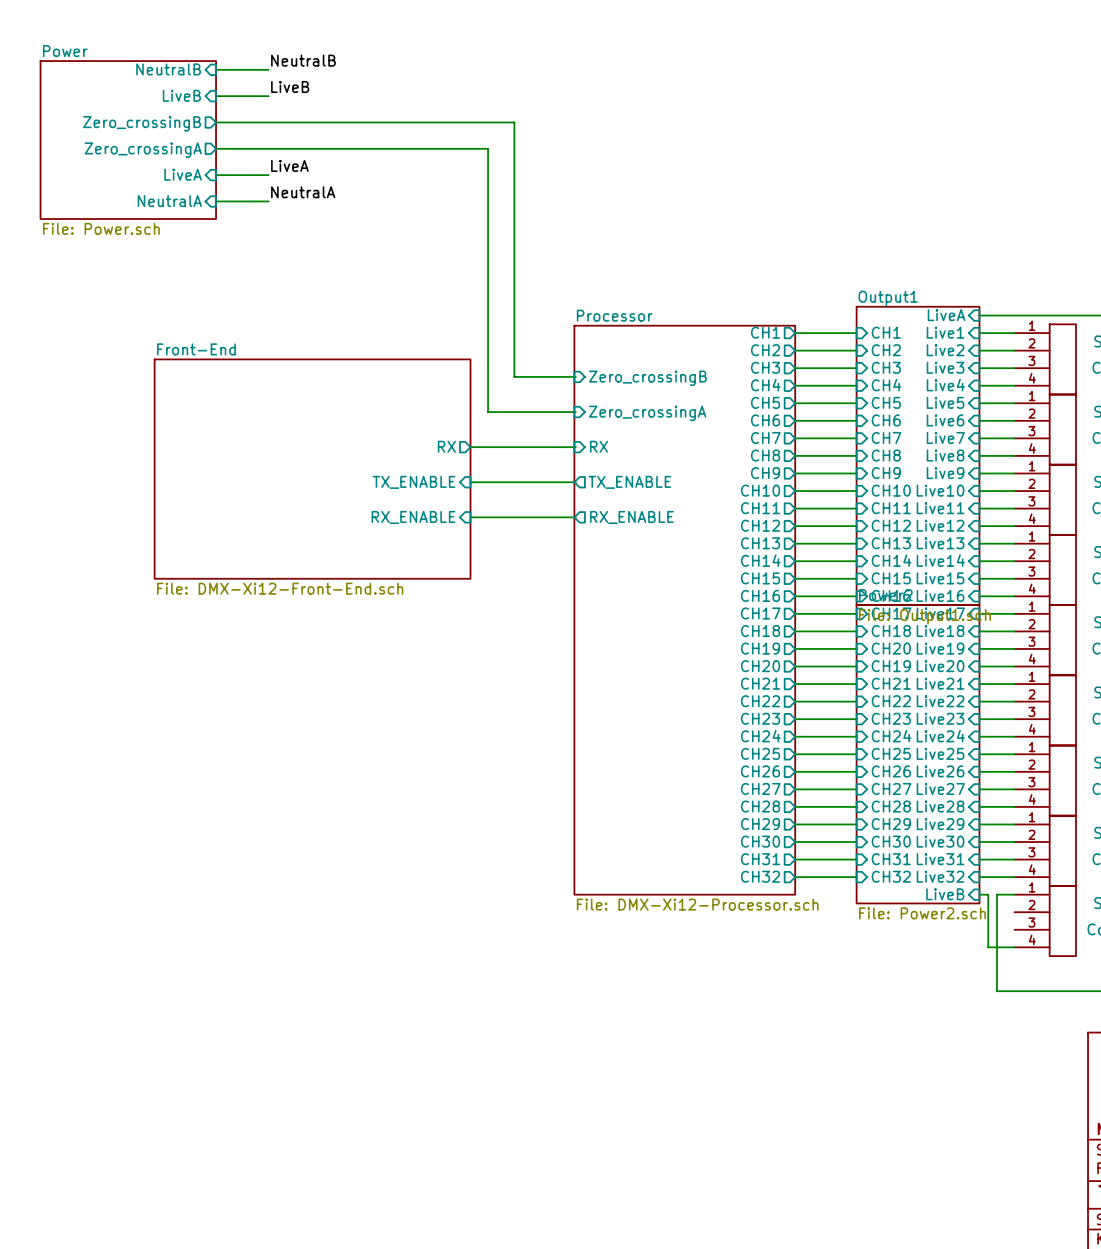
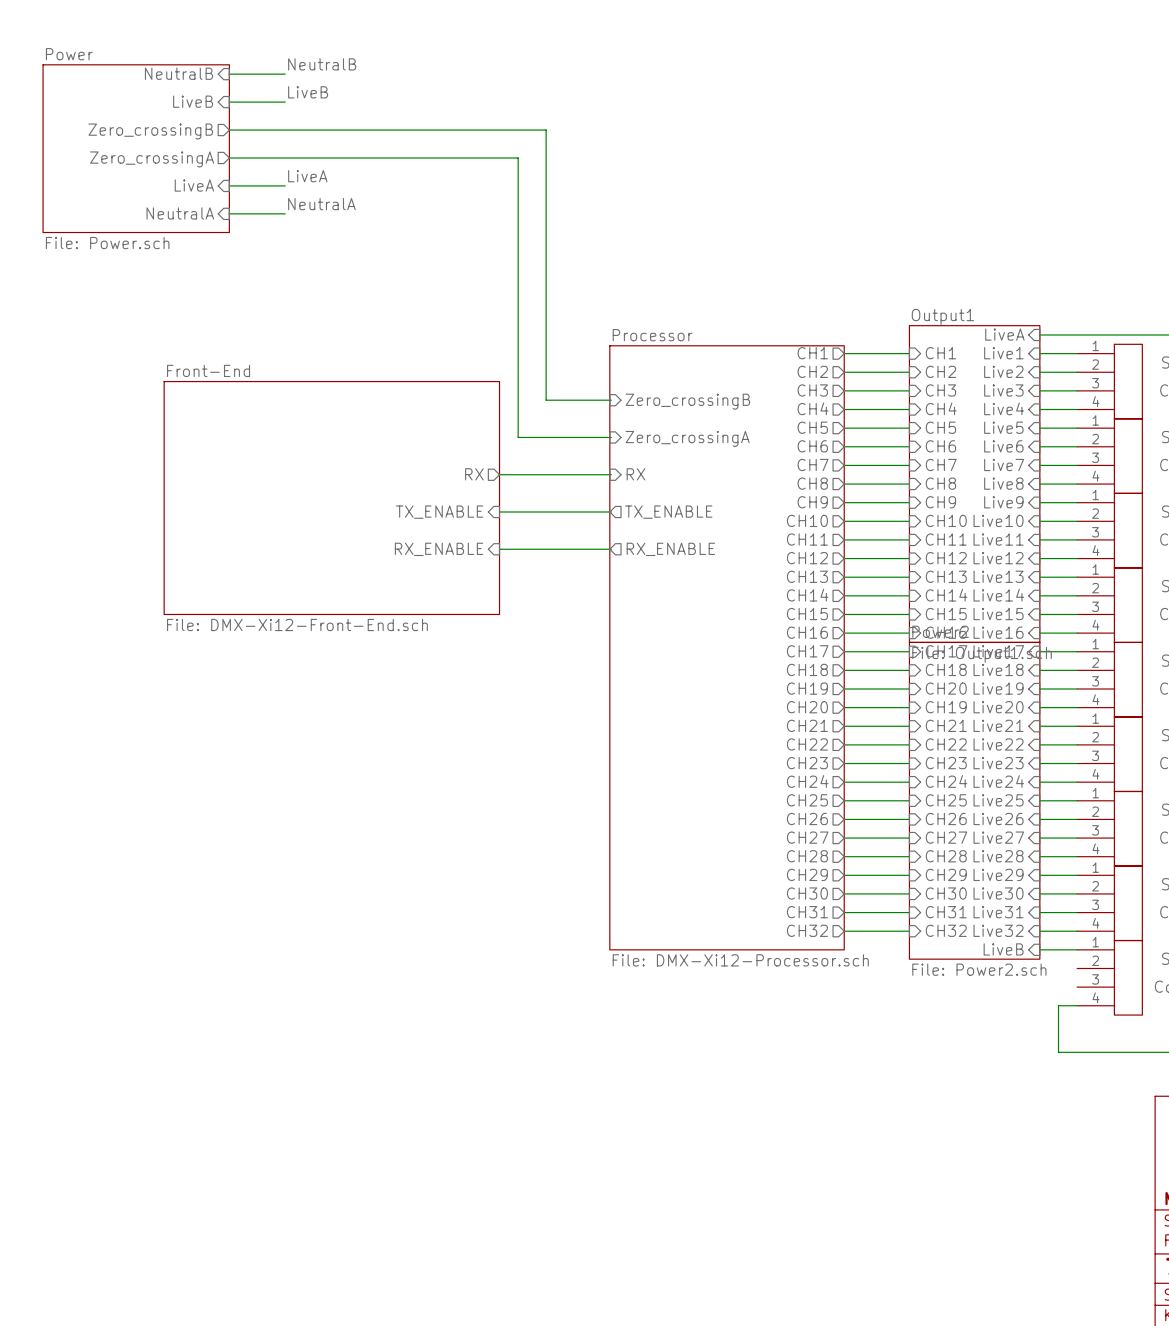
wire: (988, 894) (988, 947) (997, 947) (997, 894) -> (1049, 949) (1058, 949)

